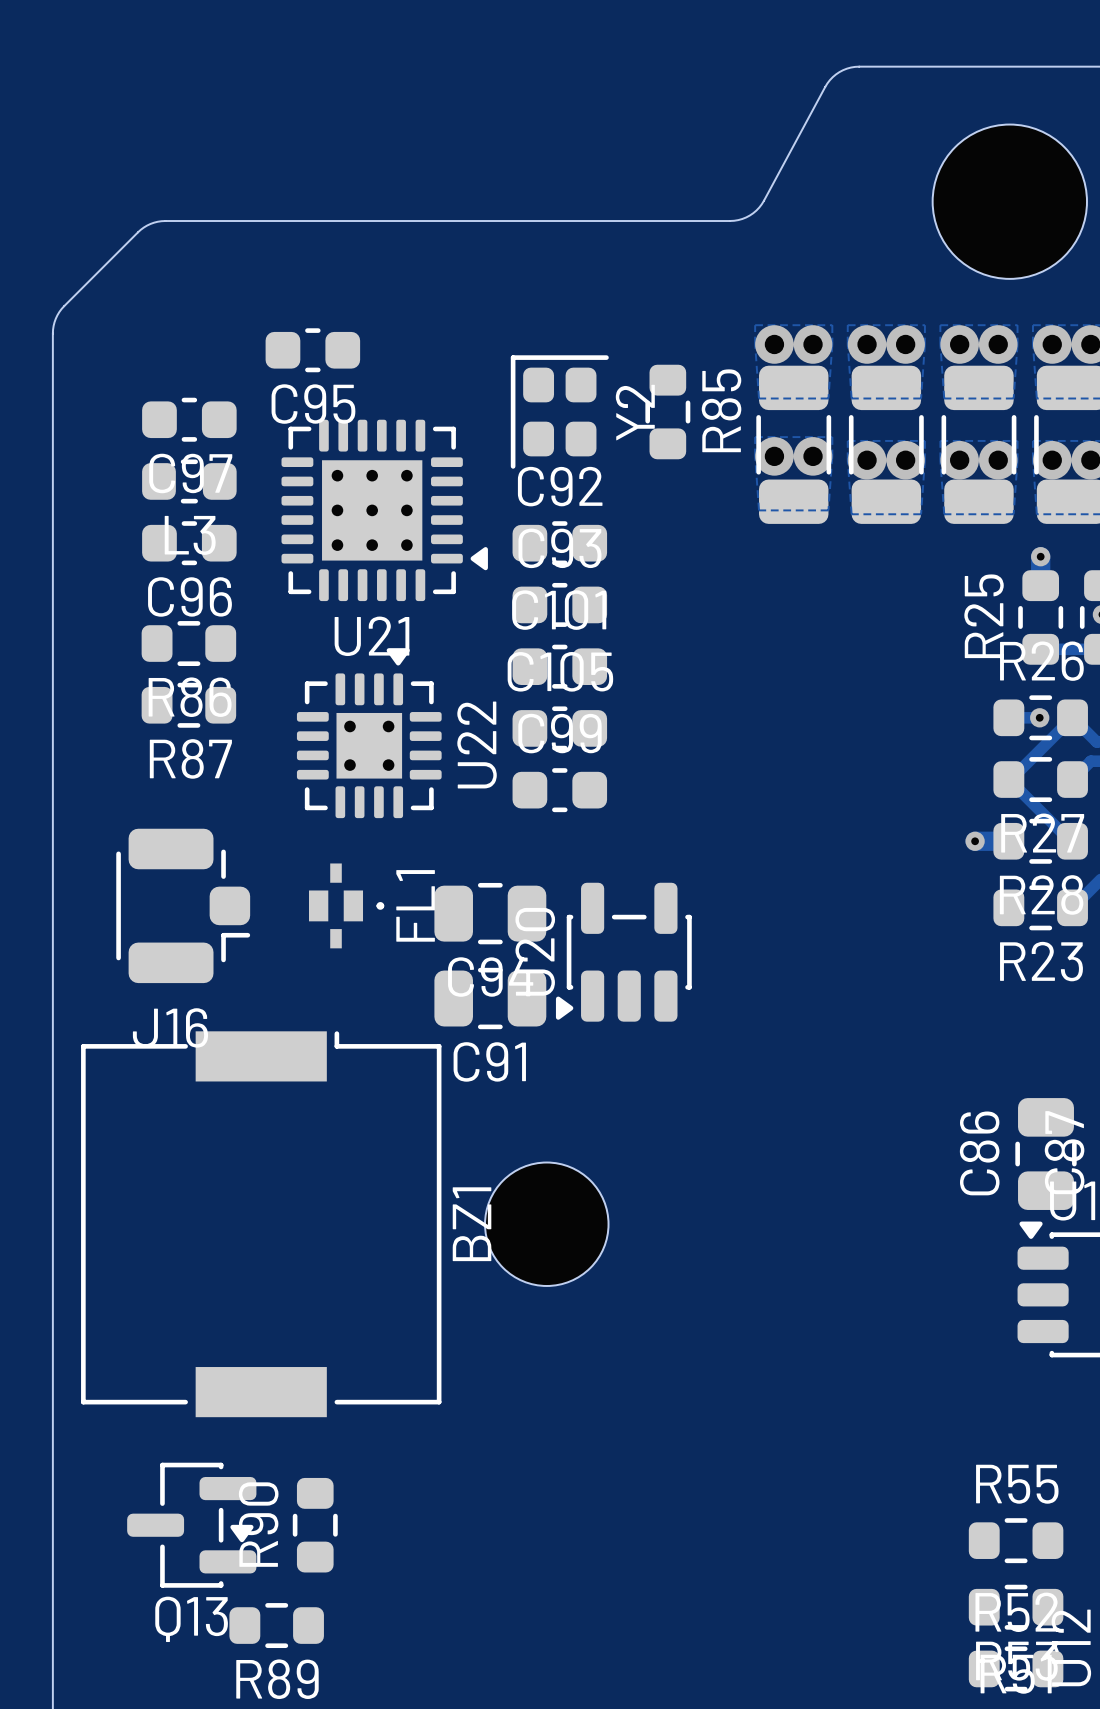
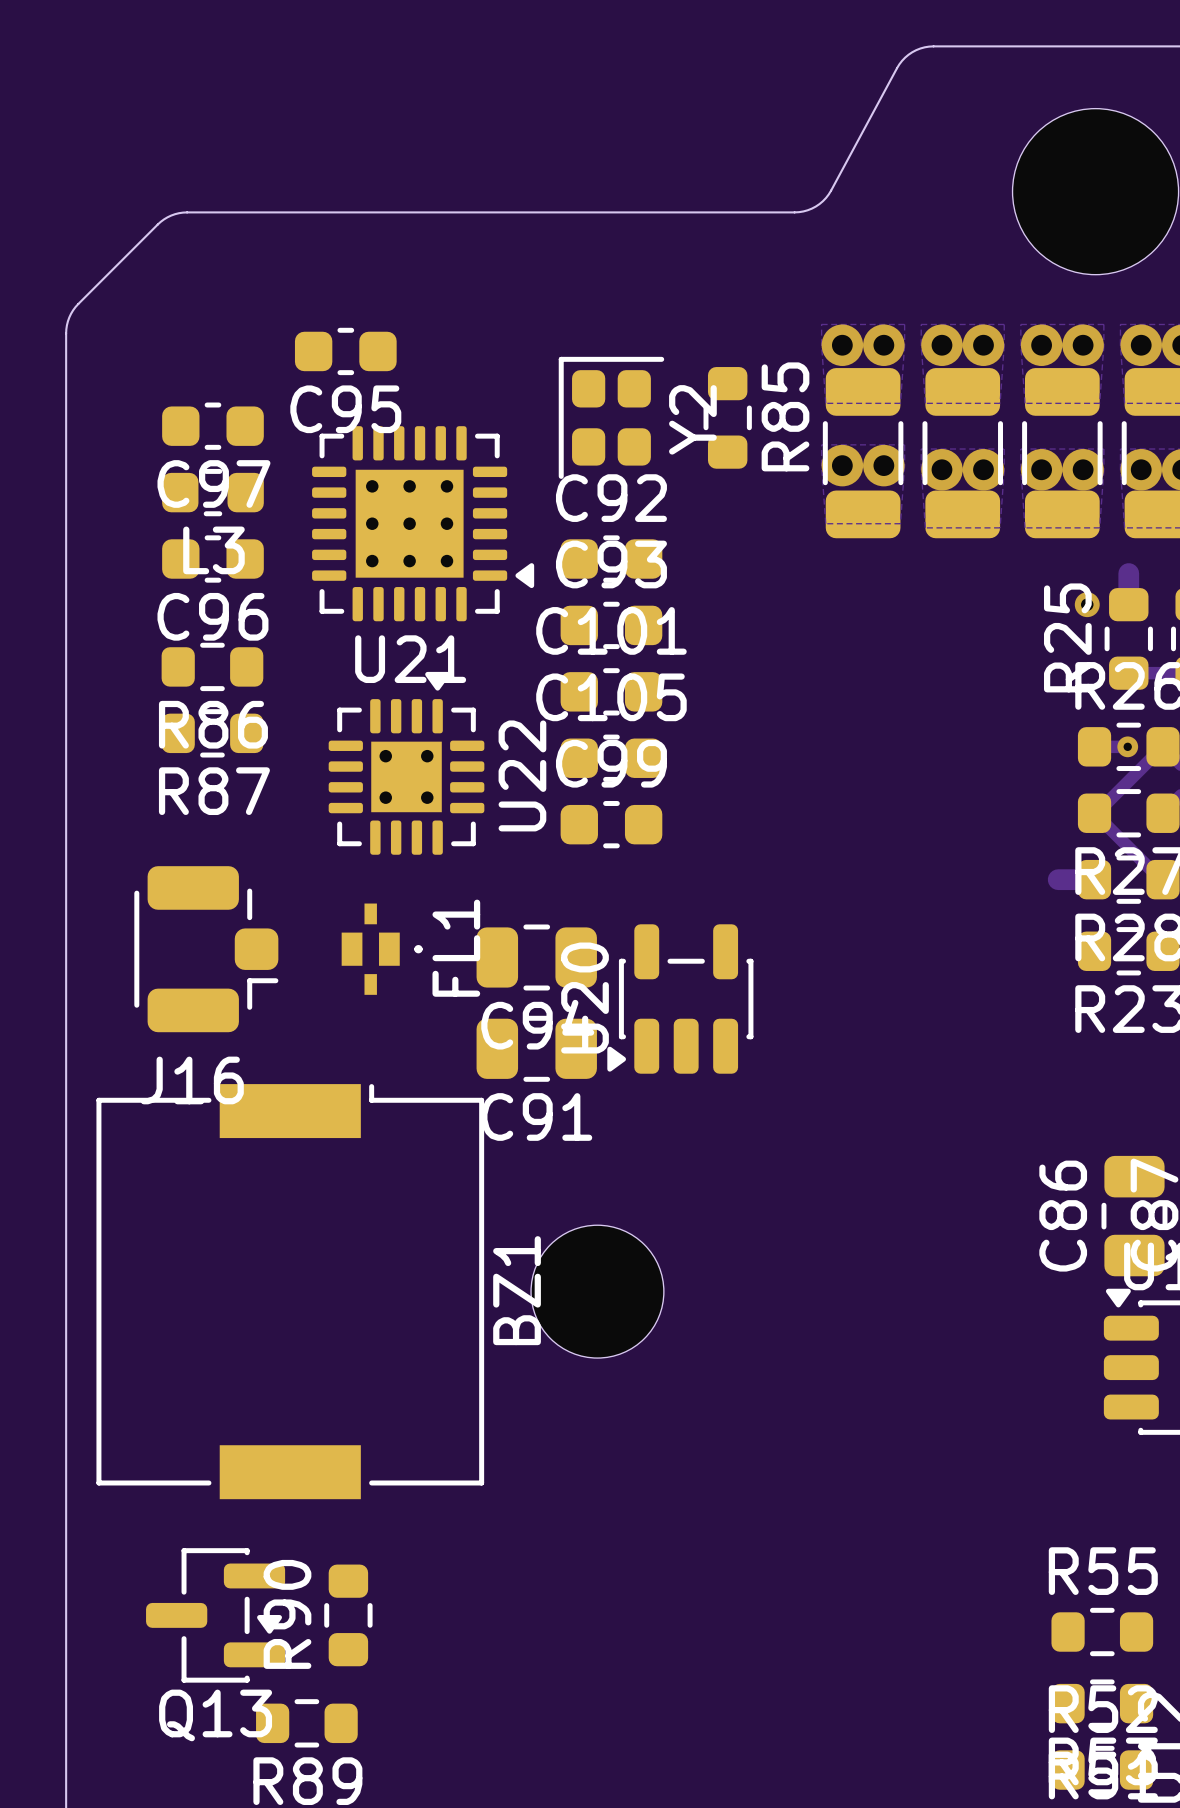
via: (1040, 556) -> none
via: none -> (1087, 604)
via: (975, 841) -> none

